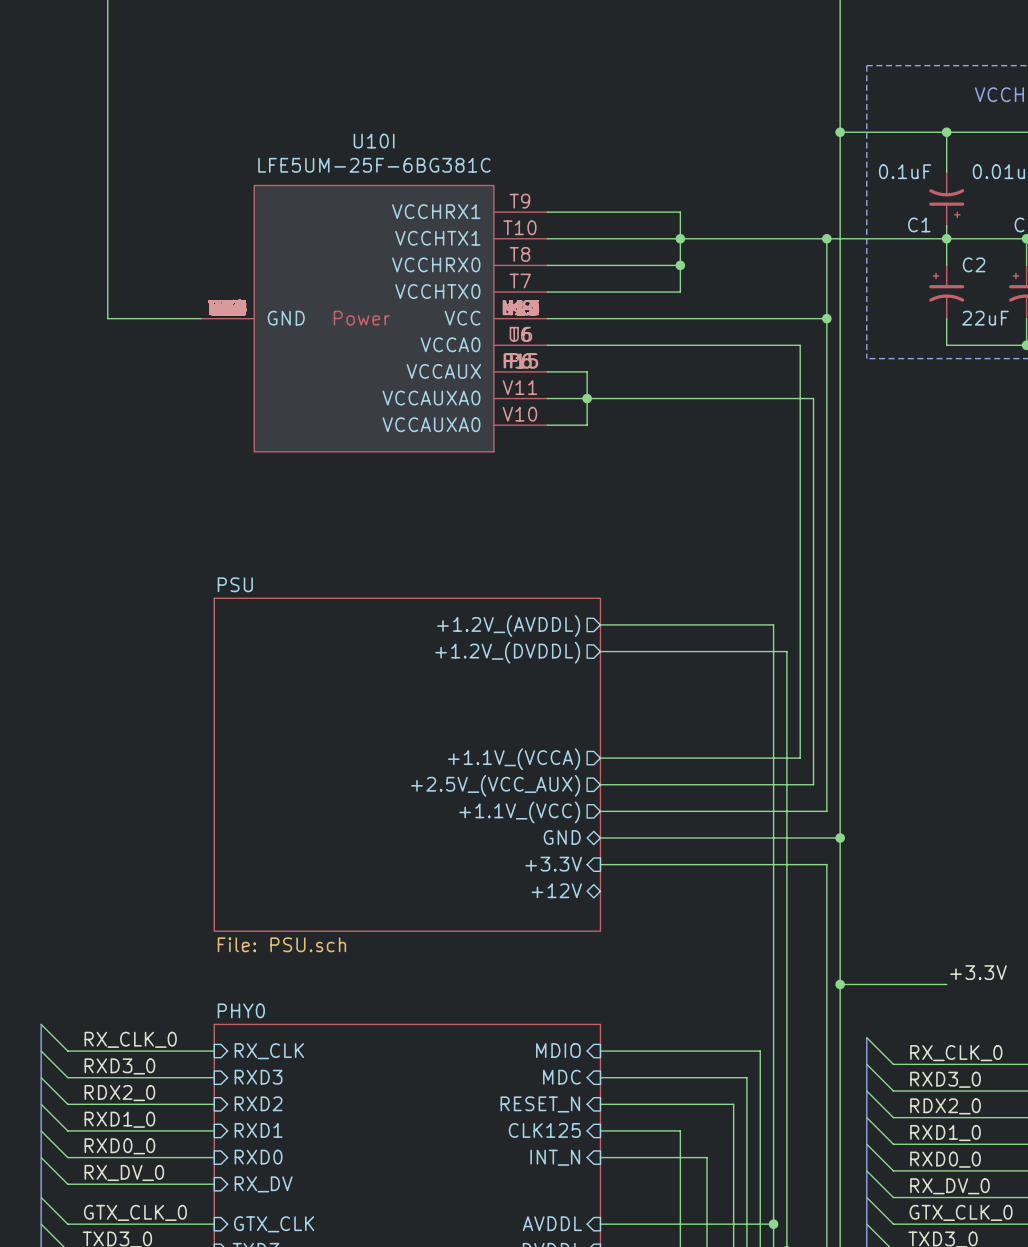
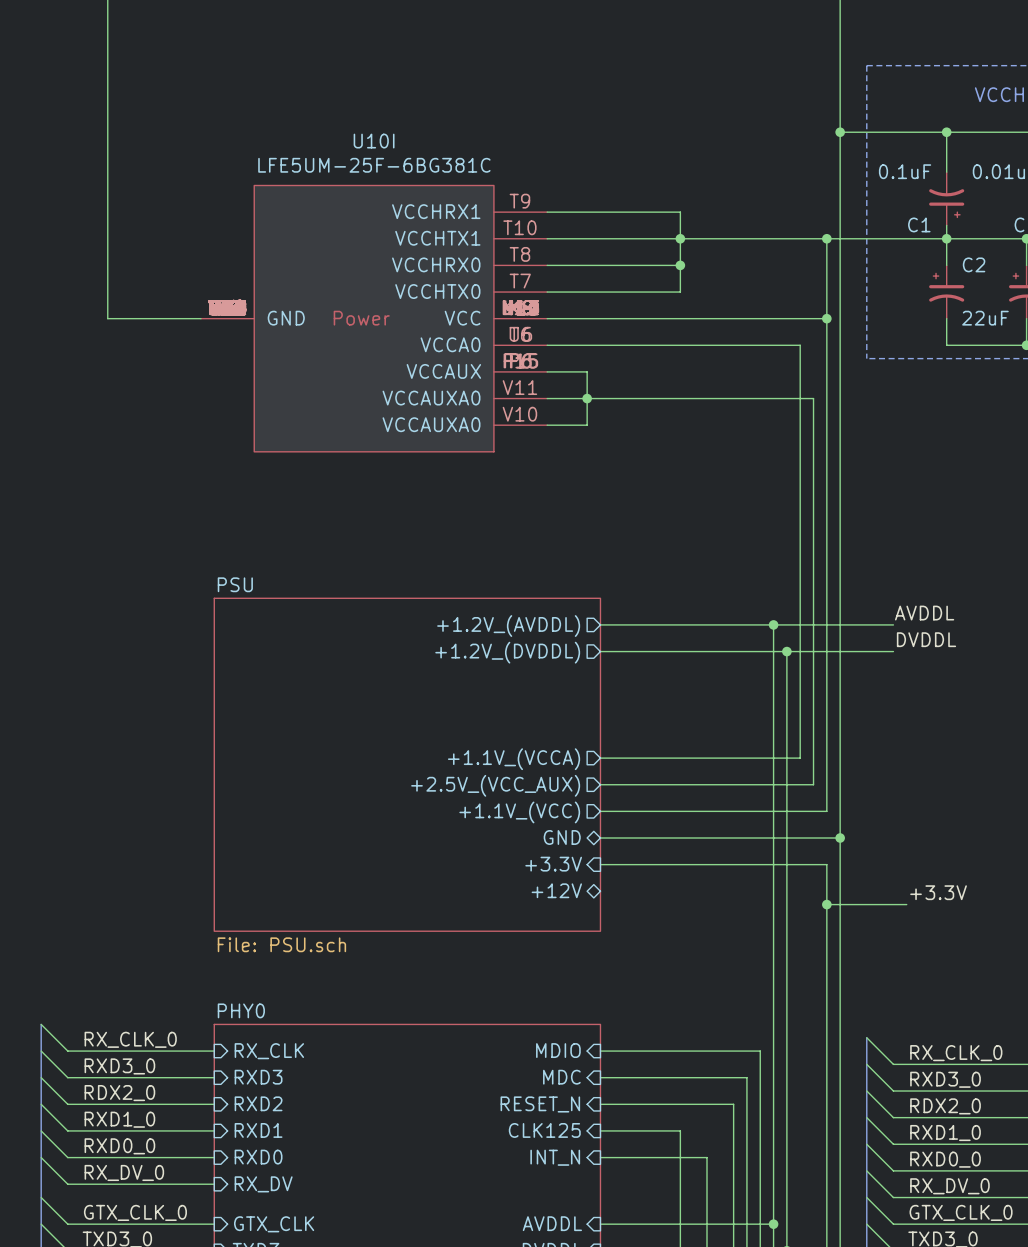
label: none -> AVDDL (924, 613)
wire: none -> (773, 624) (893, 624)
junction: none -> (773, 624)
label: none -> DVDDL (926, 639)
wire: none -> (786, 651) (893, 651)
junction: none -> (786, 651)
wire: none -> (826, 904) (906, 904)
junction: none -> (826, 904)
label position: +3.3V (978, 972) -> +3.3V (938, 892)
wire: (840, 984) (946, 984) -> none
junction: (840, 984) -> none

